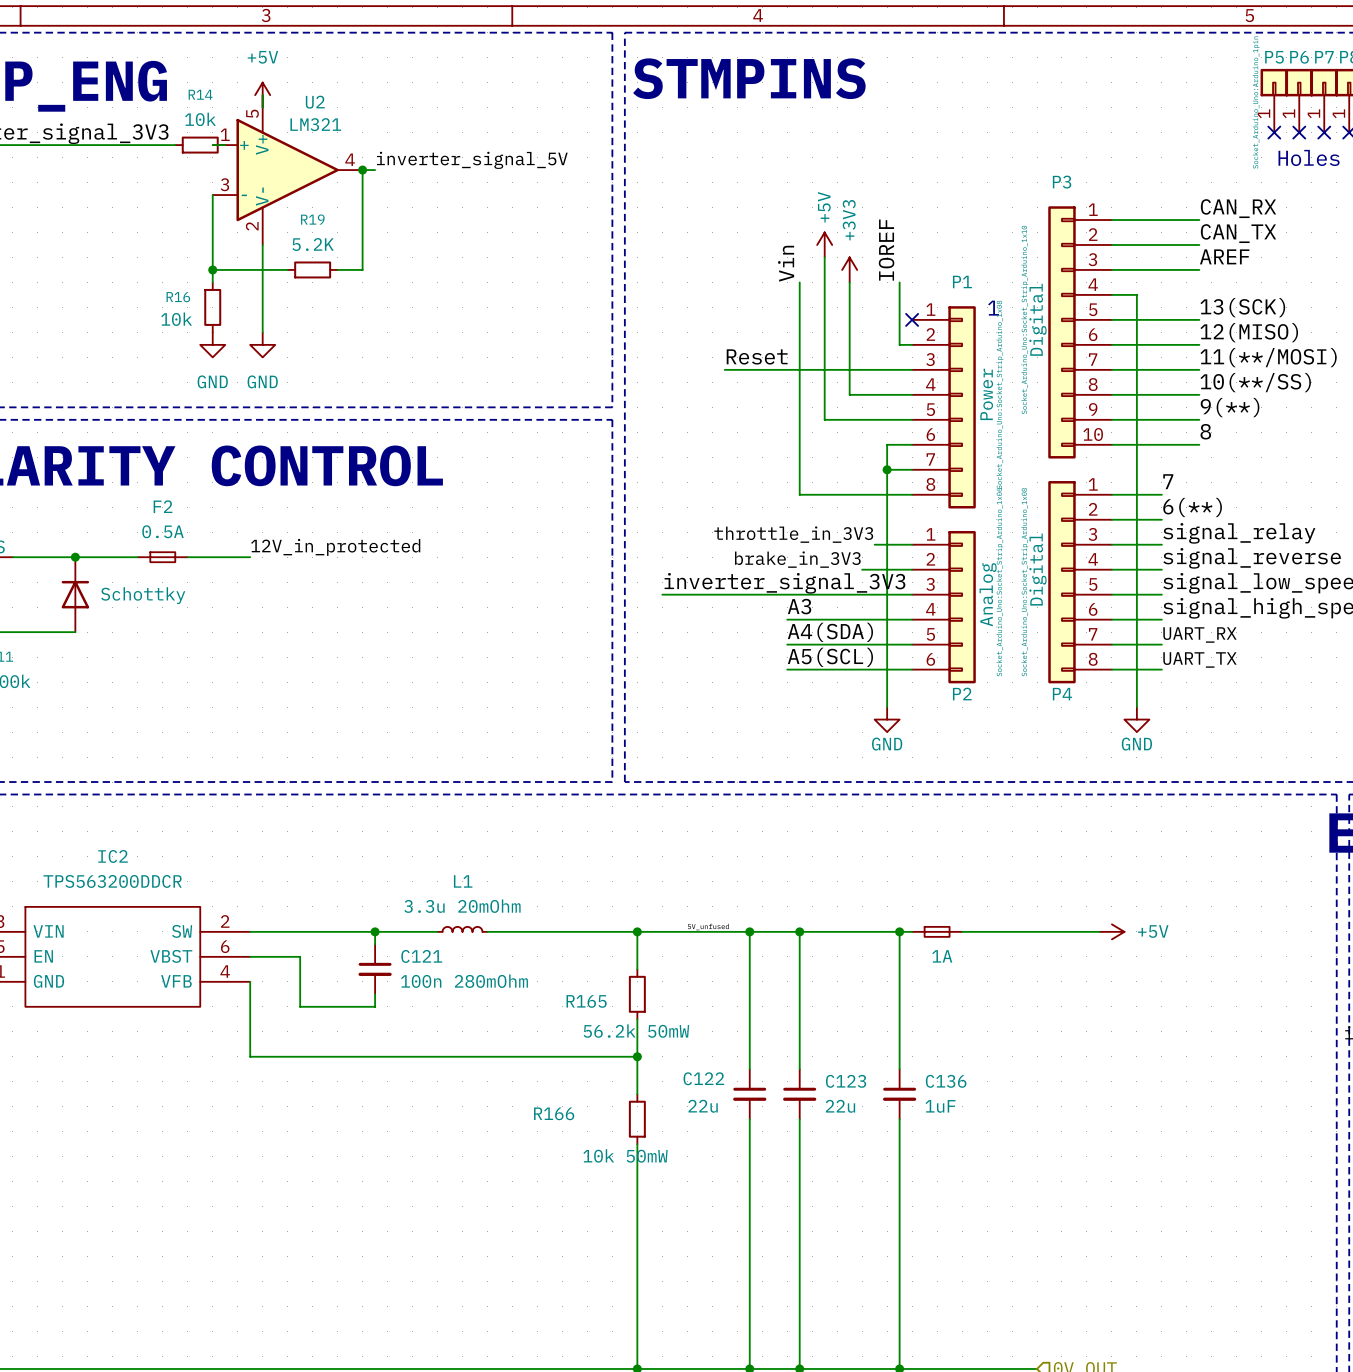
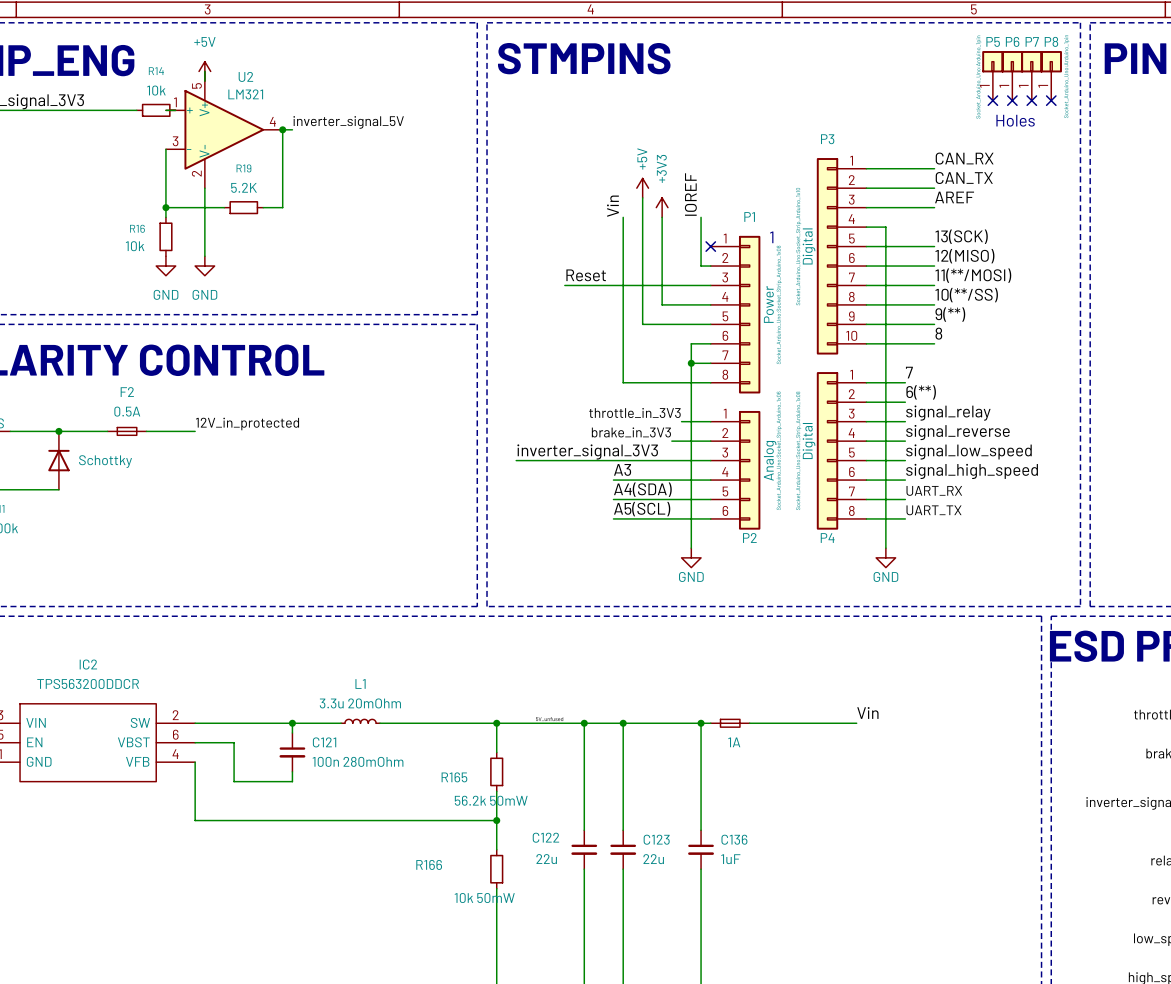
label: none -> Vin (867, 712)
power symbol: +5V (1111, 931) -> none

